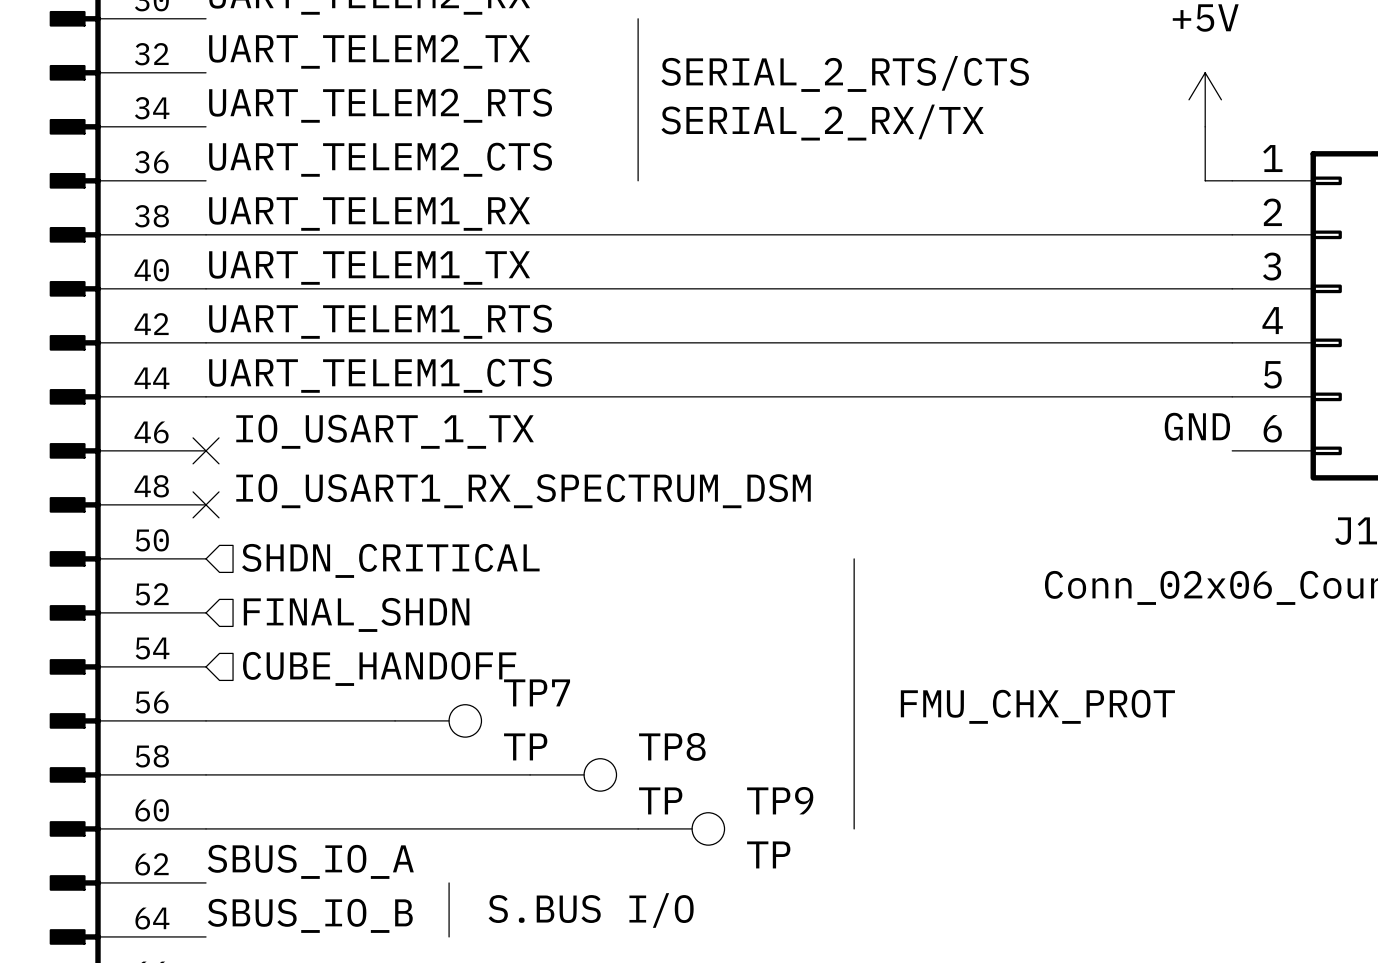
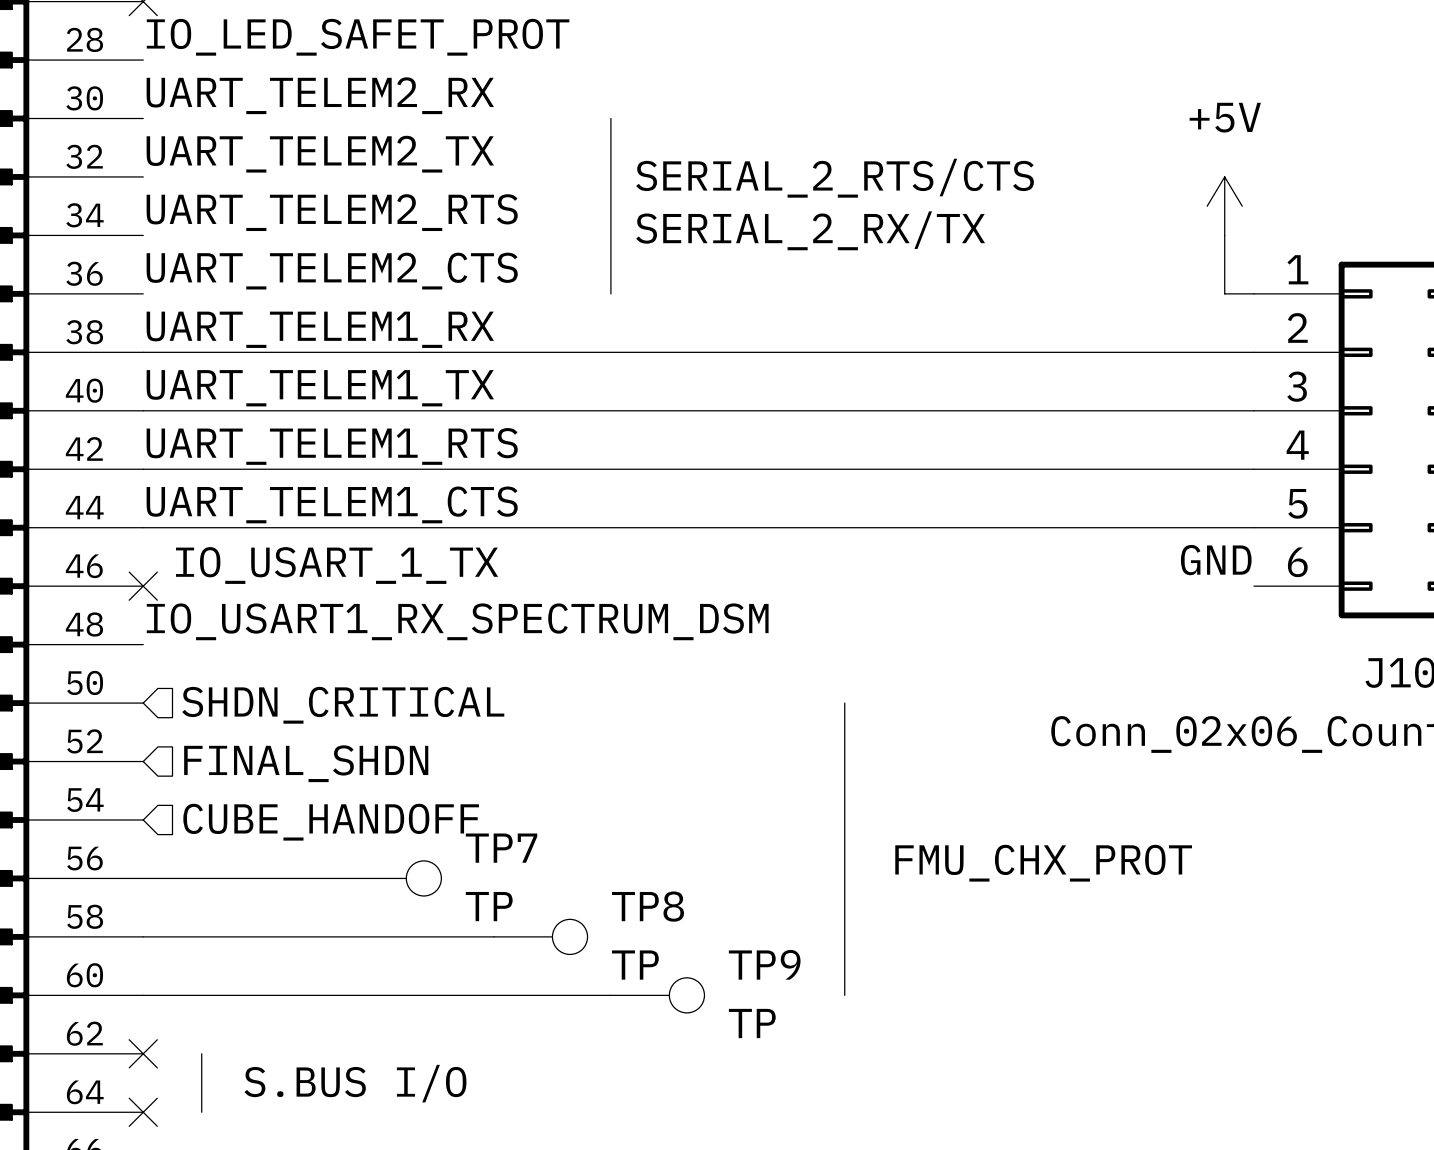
label: none -> IO_USART1_RX_SPECTRUM_DSM (457, 621)
text: IO_USART1_RX_SPECTRUM_DSM (523, 491) -> none
no-connect mark: (206, 504) -> none
label: SBUS_IO_A (310, 861) -> none
no-connect mark: none -> (143, 1053)
bus: (449, 882) (449, 936) -> (201, 1053) (201, 1112)
text position: S.BUS I/O (591, 910) -> S.BUS I/O (355, 1083)
label: SBUS_IO_B (310, 915) -> none
no-connect mark: none -> (143, 1112)

